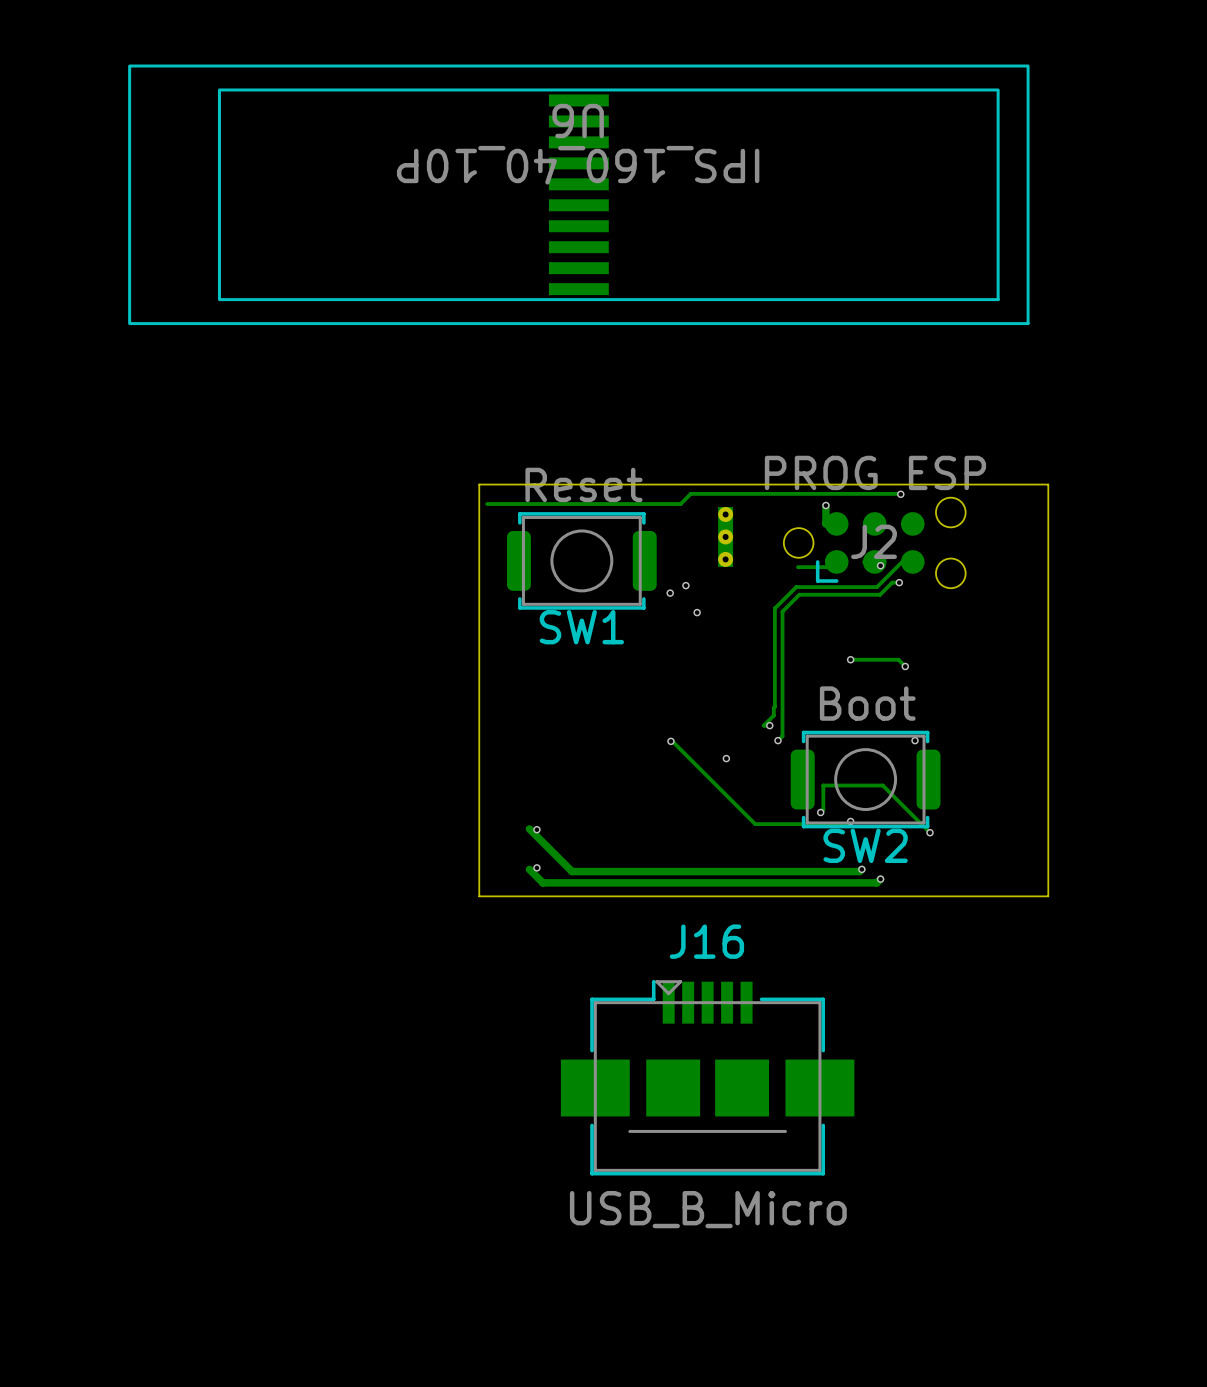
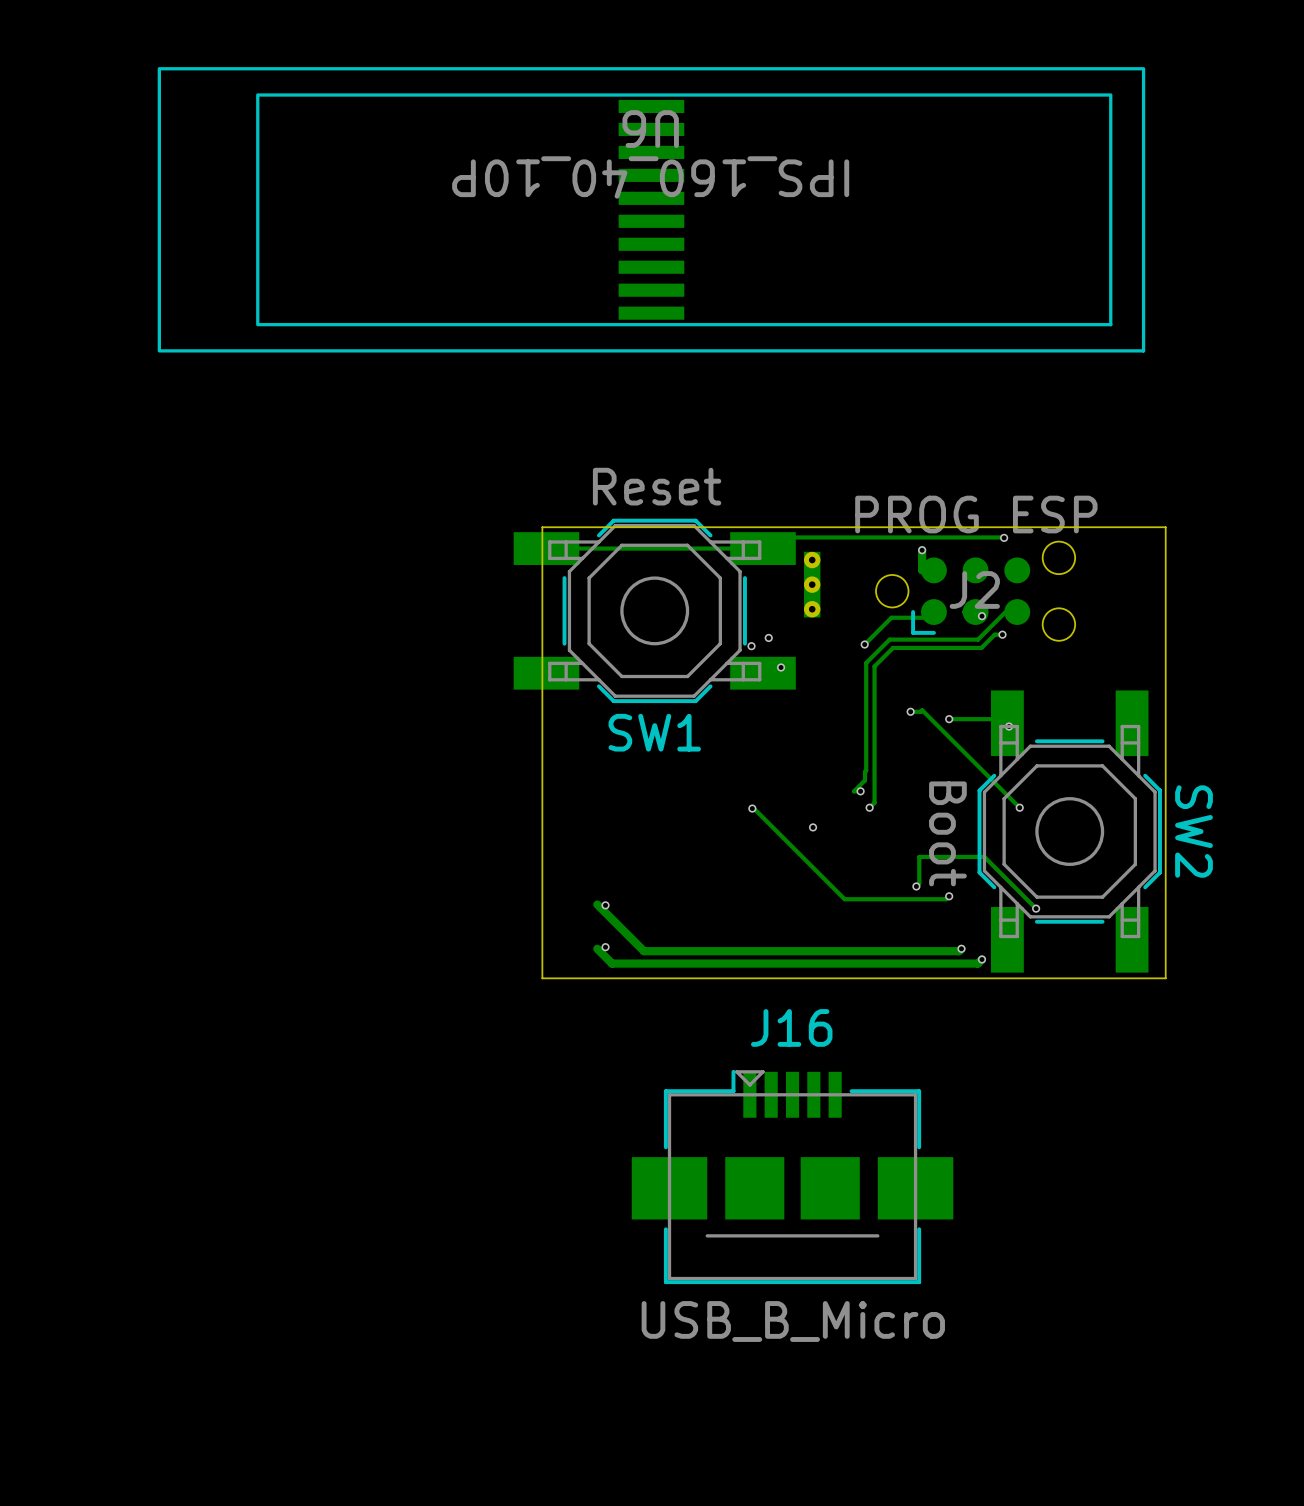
SW1 footprint: [506, 512, 657, 610] -> [513, 518, 796, 704]
track: none -> (891, 617) (864, 644)
via: none -> (864, 644)
track: none -> (910, 711) (922, 710) (1019, 807)
via: none -> (910, 711)
SW2 value position: Boot (867, 703) -> Boot (947, 833)
SW2 footprint: [790, 730, 941, 829] -> [977, 690, 1162, 973]
SW2 name position: SW2 (865, 845) -> SW2 (1194, 831)

